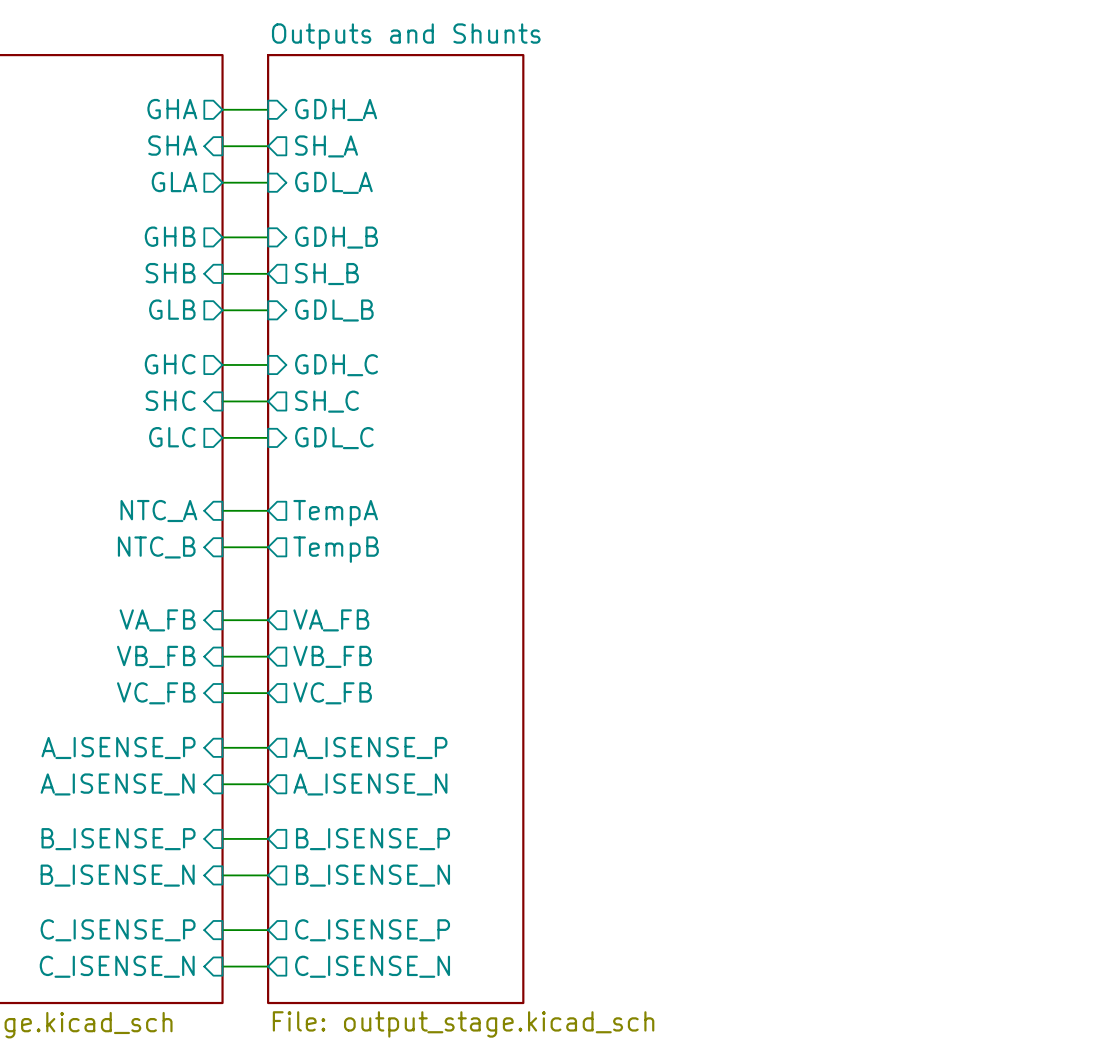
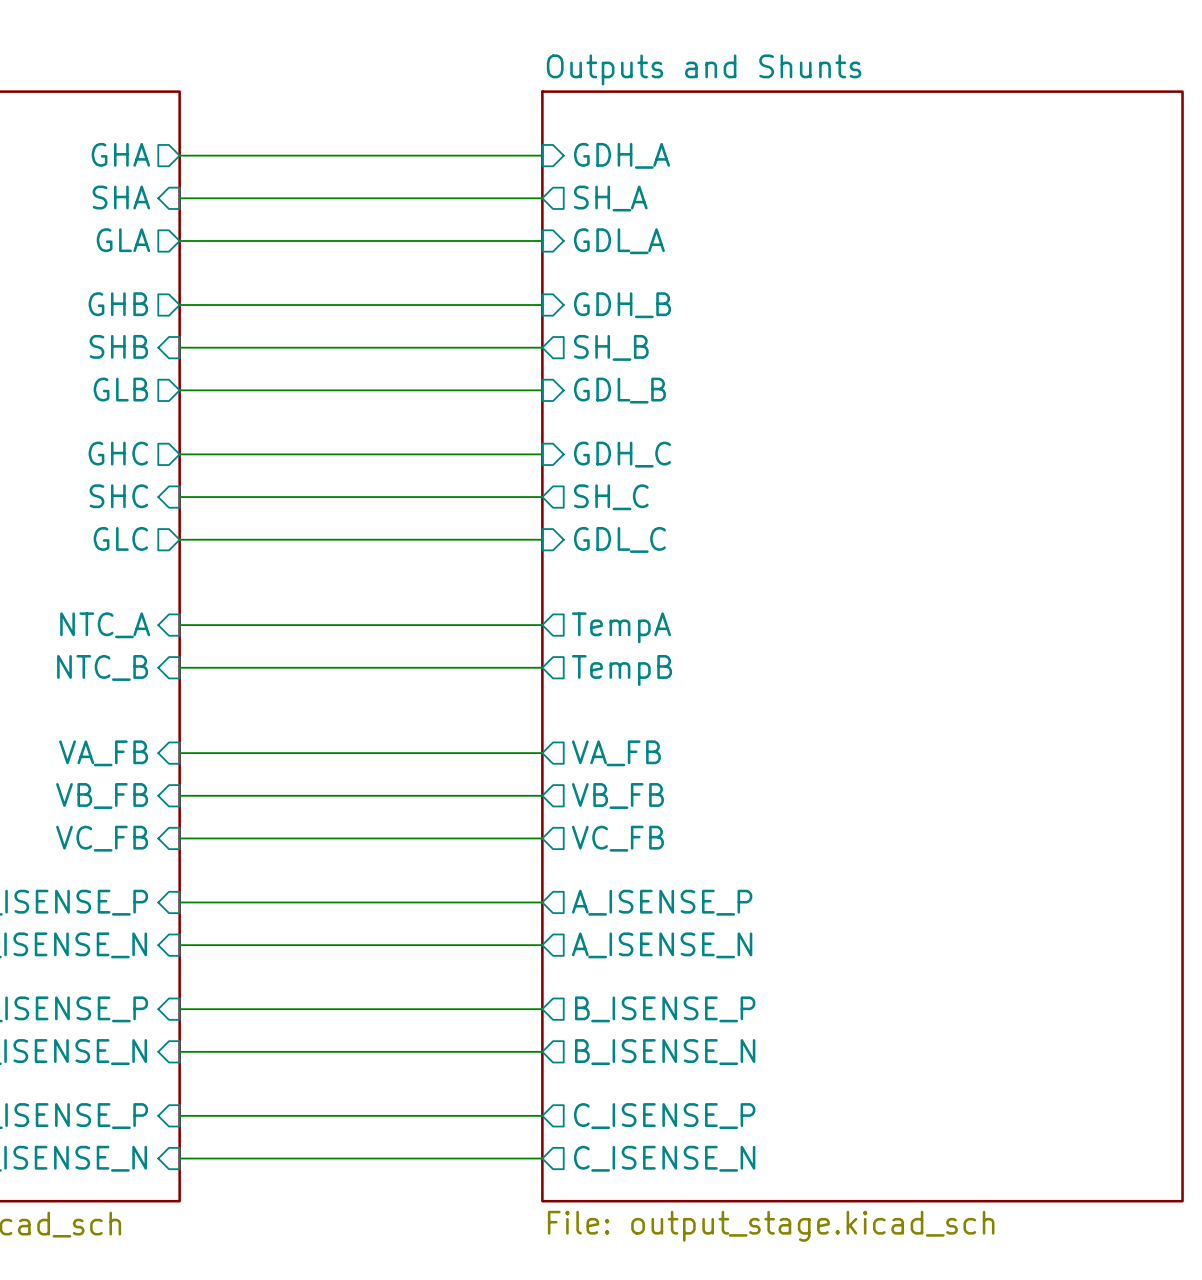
wire: none -> (232, 155) (542, 155)
sheet pin position: GDH_A (336, 109) -> GDH_A (621, 155)
wire: none -> (232, 198) (542, 198)
sheet pin position: SH_A (326, 146) -> SH_A (610, 198)
wire: none -> (232, 240) (542, 240)
sheet pin position: GDL_A (333, 182) -> GDL_A (619, 241)
wire: none -> (232, 305) (542, 305)
sheet pin position: GDH_B (336, 237) -> GDH_B (622, 305)
wire: none -> (232, 347) (542, 347)
sheet pin position: SH_B (326, 274) -> SH_B (611, 347)
wire: none -> (232, 390) (542, 390)
sheet pin position: GDL_B (334, 310) -> GDL_B (619, 390)
wire: none -> (232, 454) (542, 454)
sheet pin position: GDH_C (336, 365) -> GDH_C (622, 454)
wire: none -> (232, 497) (542, 497)
sheet pin position: SH_C (326, 401) -> SH_C (611, 497)
wire: none -> (232, 539) (542, 539)
sheet pin position: GDL_C (334, 438) -> GDL_C (619, 539)
wire: none -> (232, 625) (542, 625)
sheet pin position: TempA (335, 513) -> TempA (621, 627)
sheet Outputs and Shunts: File: output_stage.kicad_sch (395, 529) -> none
sheet Outputs and Shunts: none -> File: output_stage.kicad_sch (862, 646)
wire: none -> (232, 667) (542, 667)
sheet pin position: TempB (336, 549) -> TempB (621, 670)
wire: none -> (232, 753) (542, 753)
sheet pin position: VA_FB (331, 620) -> VA_FB (616, 753)
wire: none -> (232, 795) (542, 795)
sheet pin position: VB_FB (332, 656) -> VB_FB (617, 796)
wire: none -> (232, 838) (542, 838)
sheet pin position: VC_FB (332, 693) -> VC_FB (617, 838)
wire: none -> (232, 902) (542, 902)
sheet pin position: A_ISENSE_P (370, 747) -> A_ISENSE_P (662, 902)
wire: none -> (232, 945) (542, 945)
sheet pin position: A_ISENSE_N (370, 784) -> A_ISENSE_N (662, 945)
wire: none -> (232, 1009) (542, 1009)
sheet pin position: B_ISENSE_P (372, 839) -> B_ISENSE_P (665, 1009)
wire: none -> (232, 1051) (542, 1051)
sheet pin position: B_ISENSE_N (372, 875) -> B_ISENSE_N (665, 1052)
wire: none -> (232, 1115) (542, 1115)
sheet pin position: C_ISENSE_P (372, 930) -> C_ISENSE_P (664, 1116)
wire: none -> (232, 1158) (542, 1158)
sheet pin position: C_ISENSE_N (372, 966) -> C_ISENSE_N (664, 1158)

